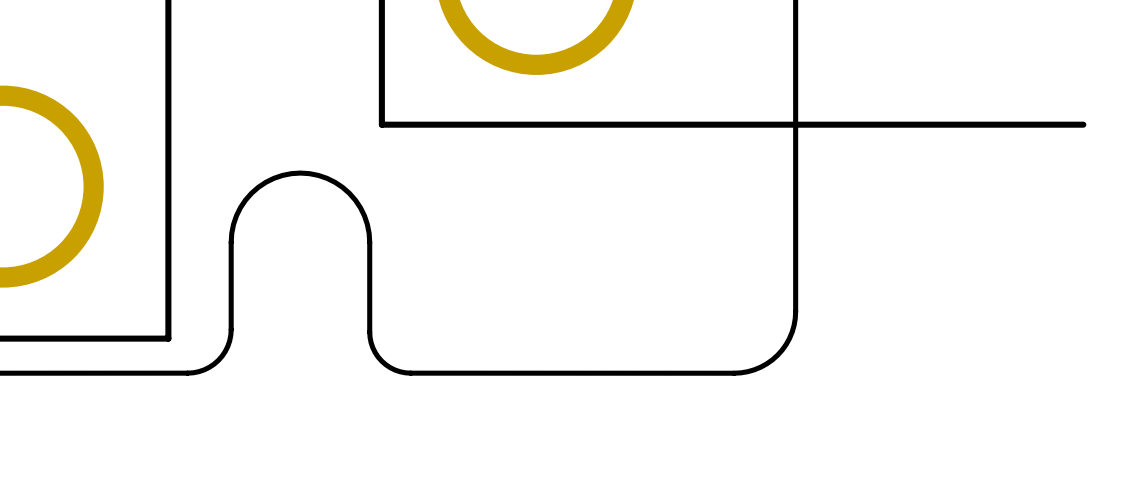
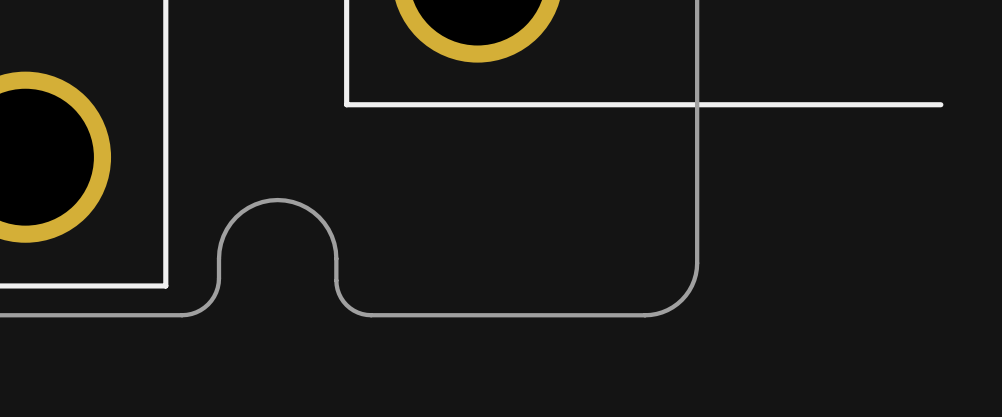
board edge: (231, 306) (231, 233) (240, 207) (251, 193) (265, 182) (282, 175) (300, 173) (318, 175) (335, 182) (349, 193) (360, 207) (369, 233) (369, 306) -> (219, 258) (223, 236) (236, 217) (255, 204) (277, 200) (300, 204) (319, 217) (331, 236) (336, 258)

